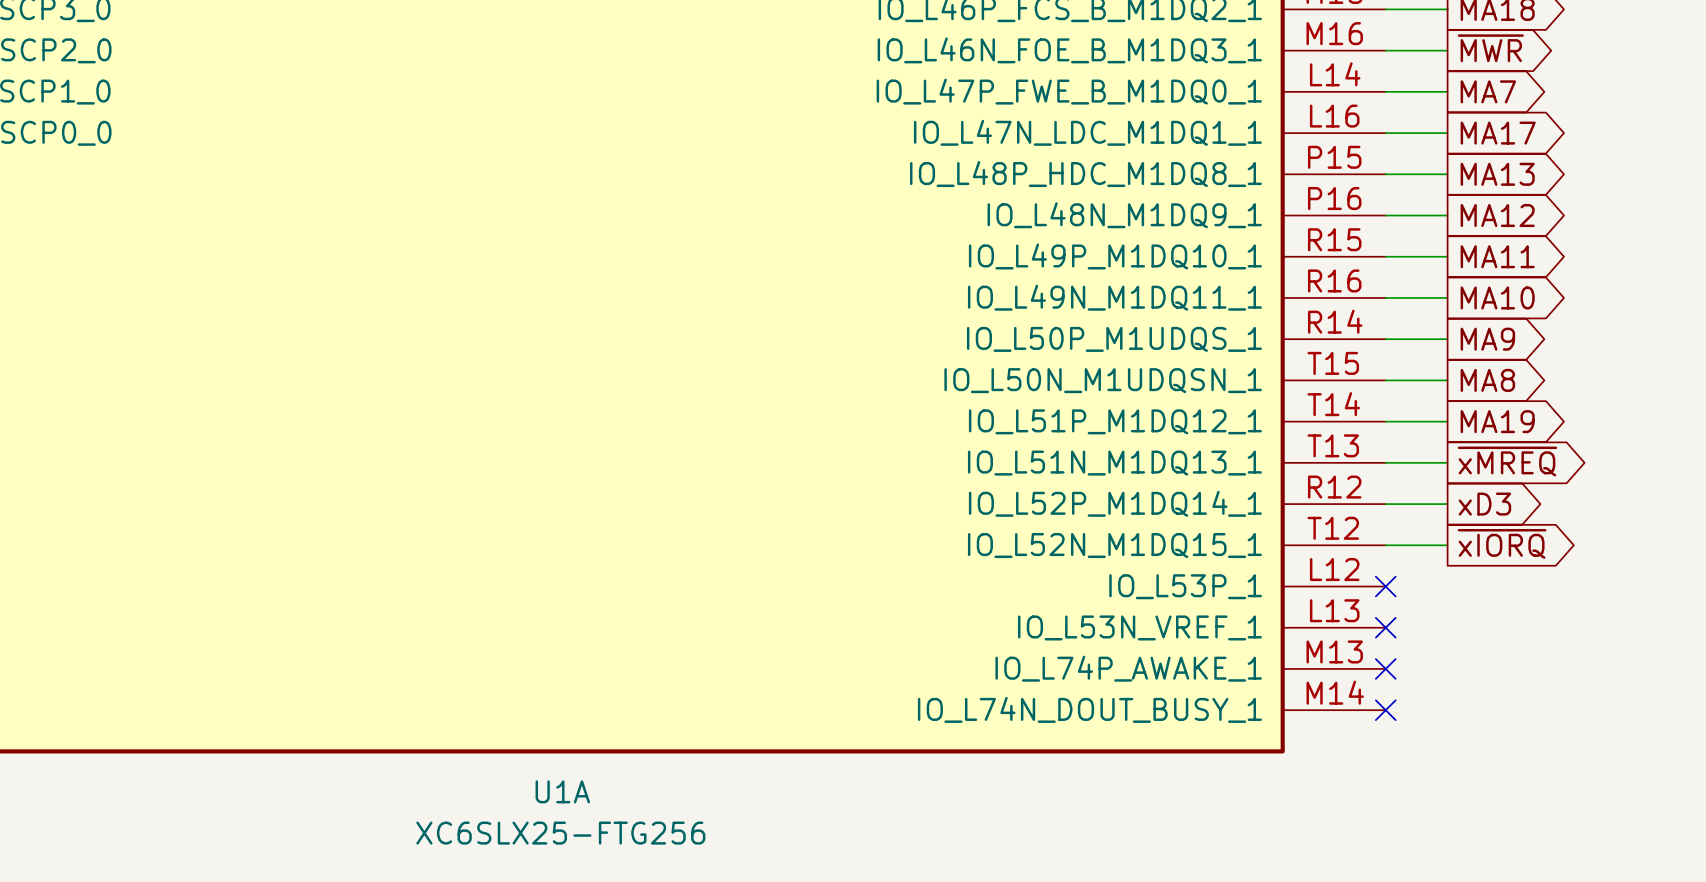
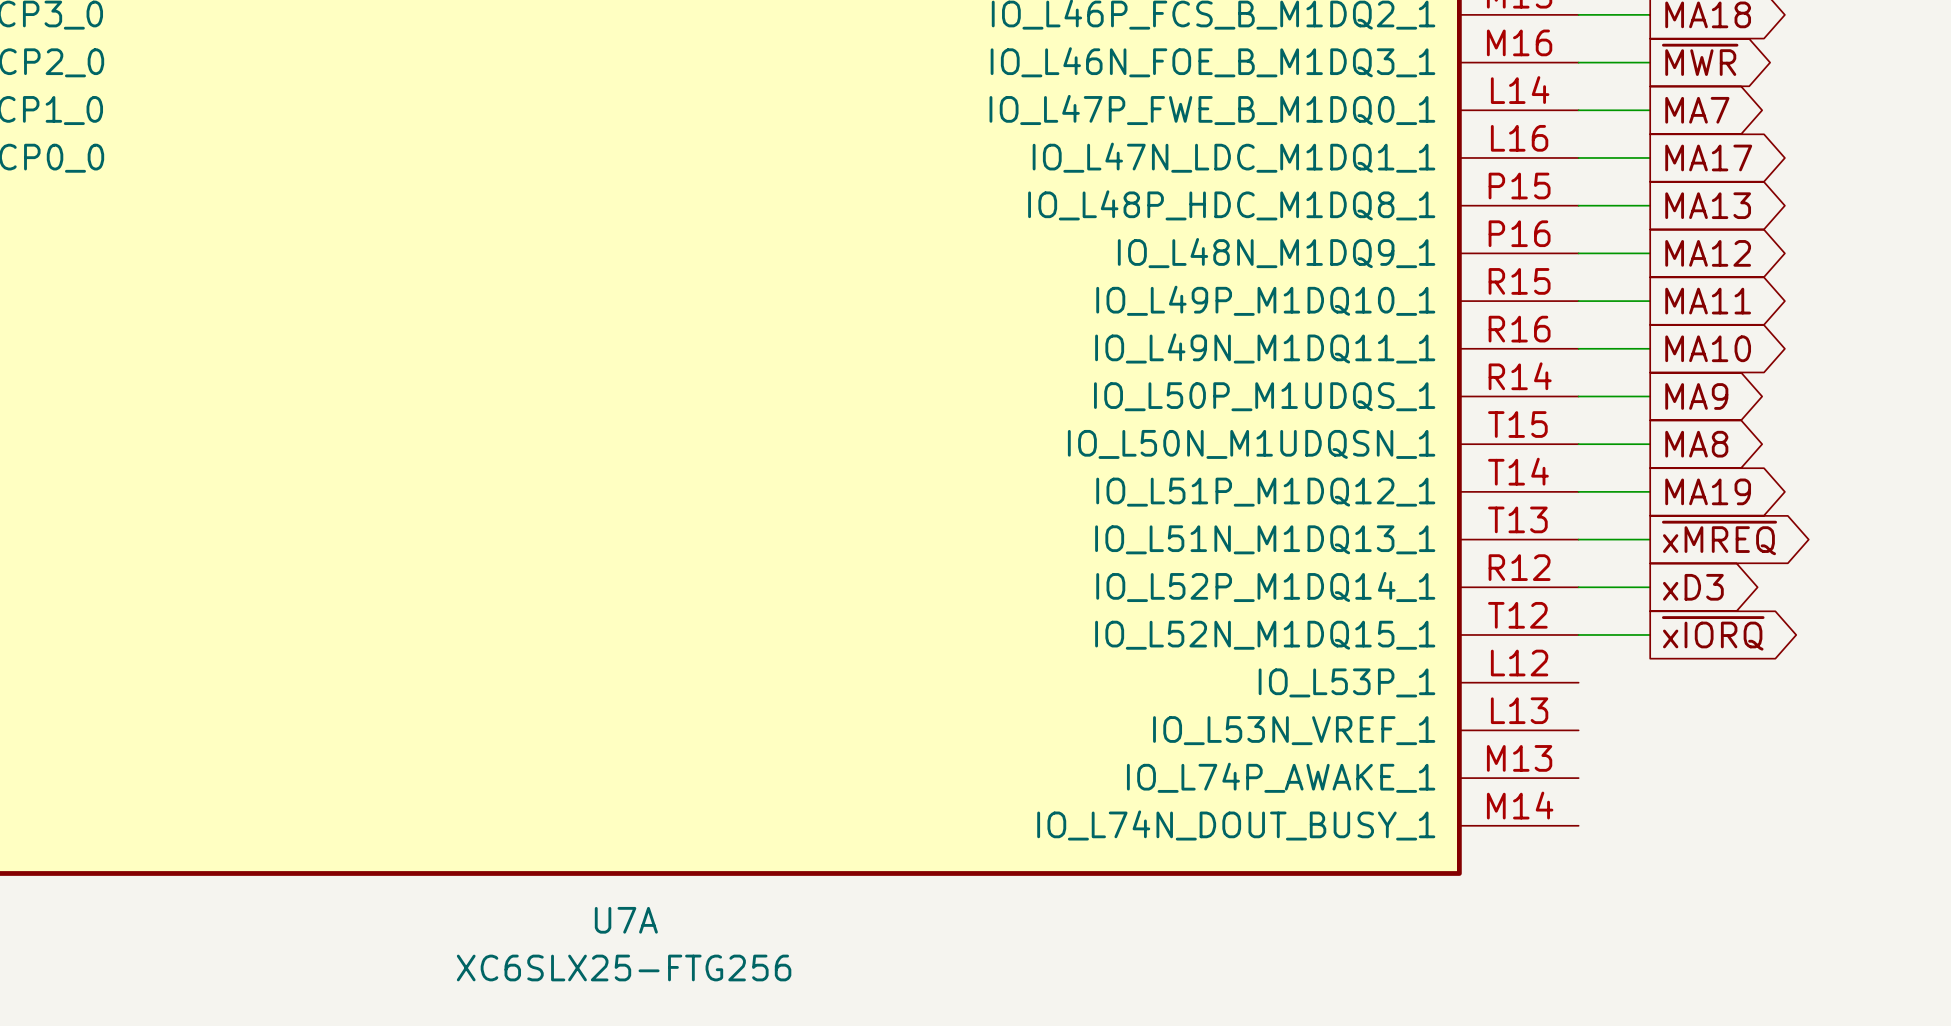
no-connect mark: (1385, 586) -> none
no-connect mark: (1385, 627) -> none
no-connect mark: (1385, 668) -> none
no-connect mark: (1385, 710) -> none
U1A name: U1A (562, 791) -> U7A (626, 920)

